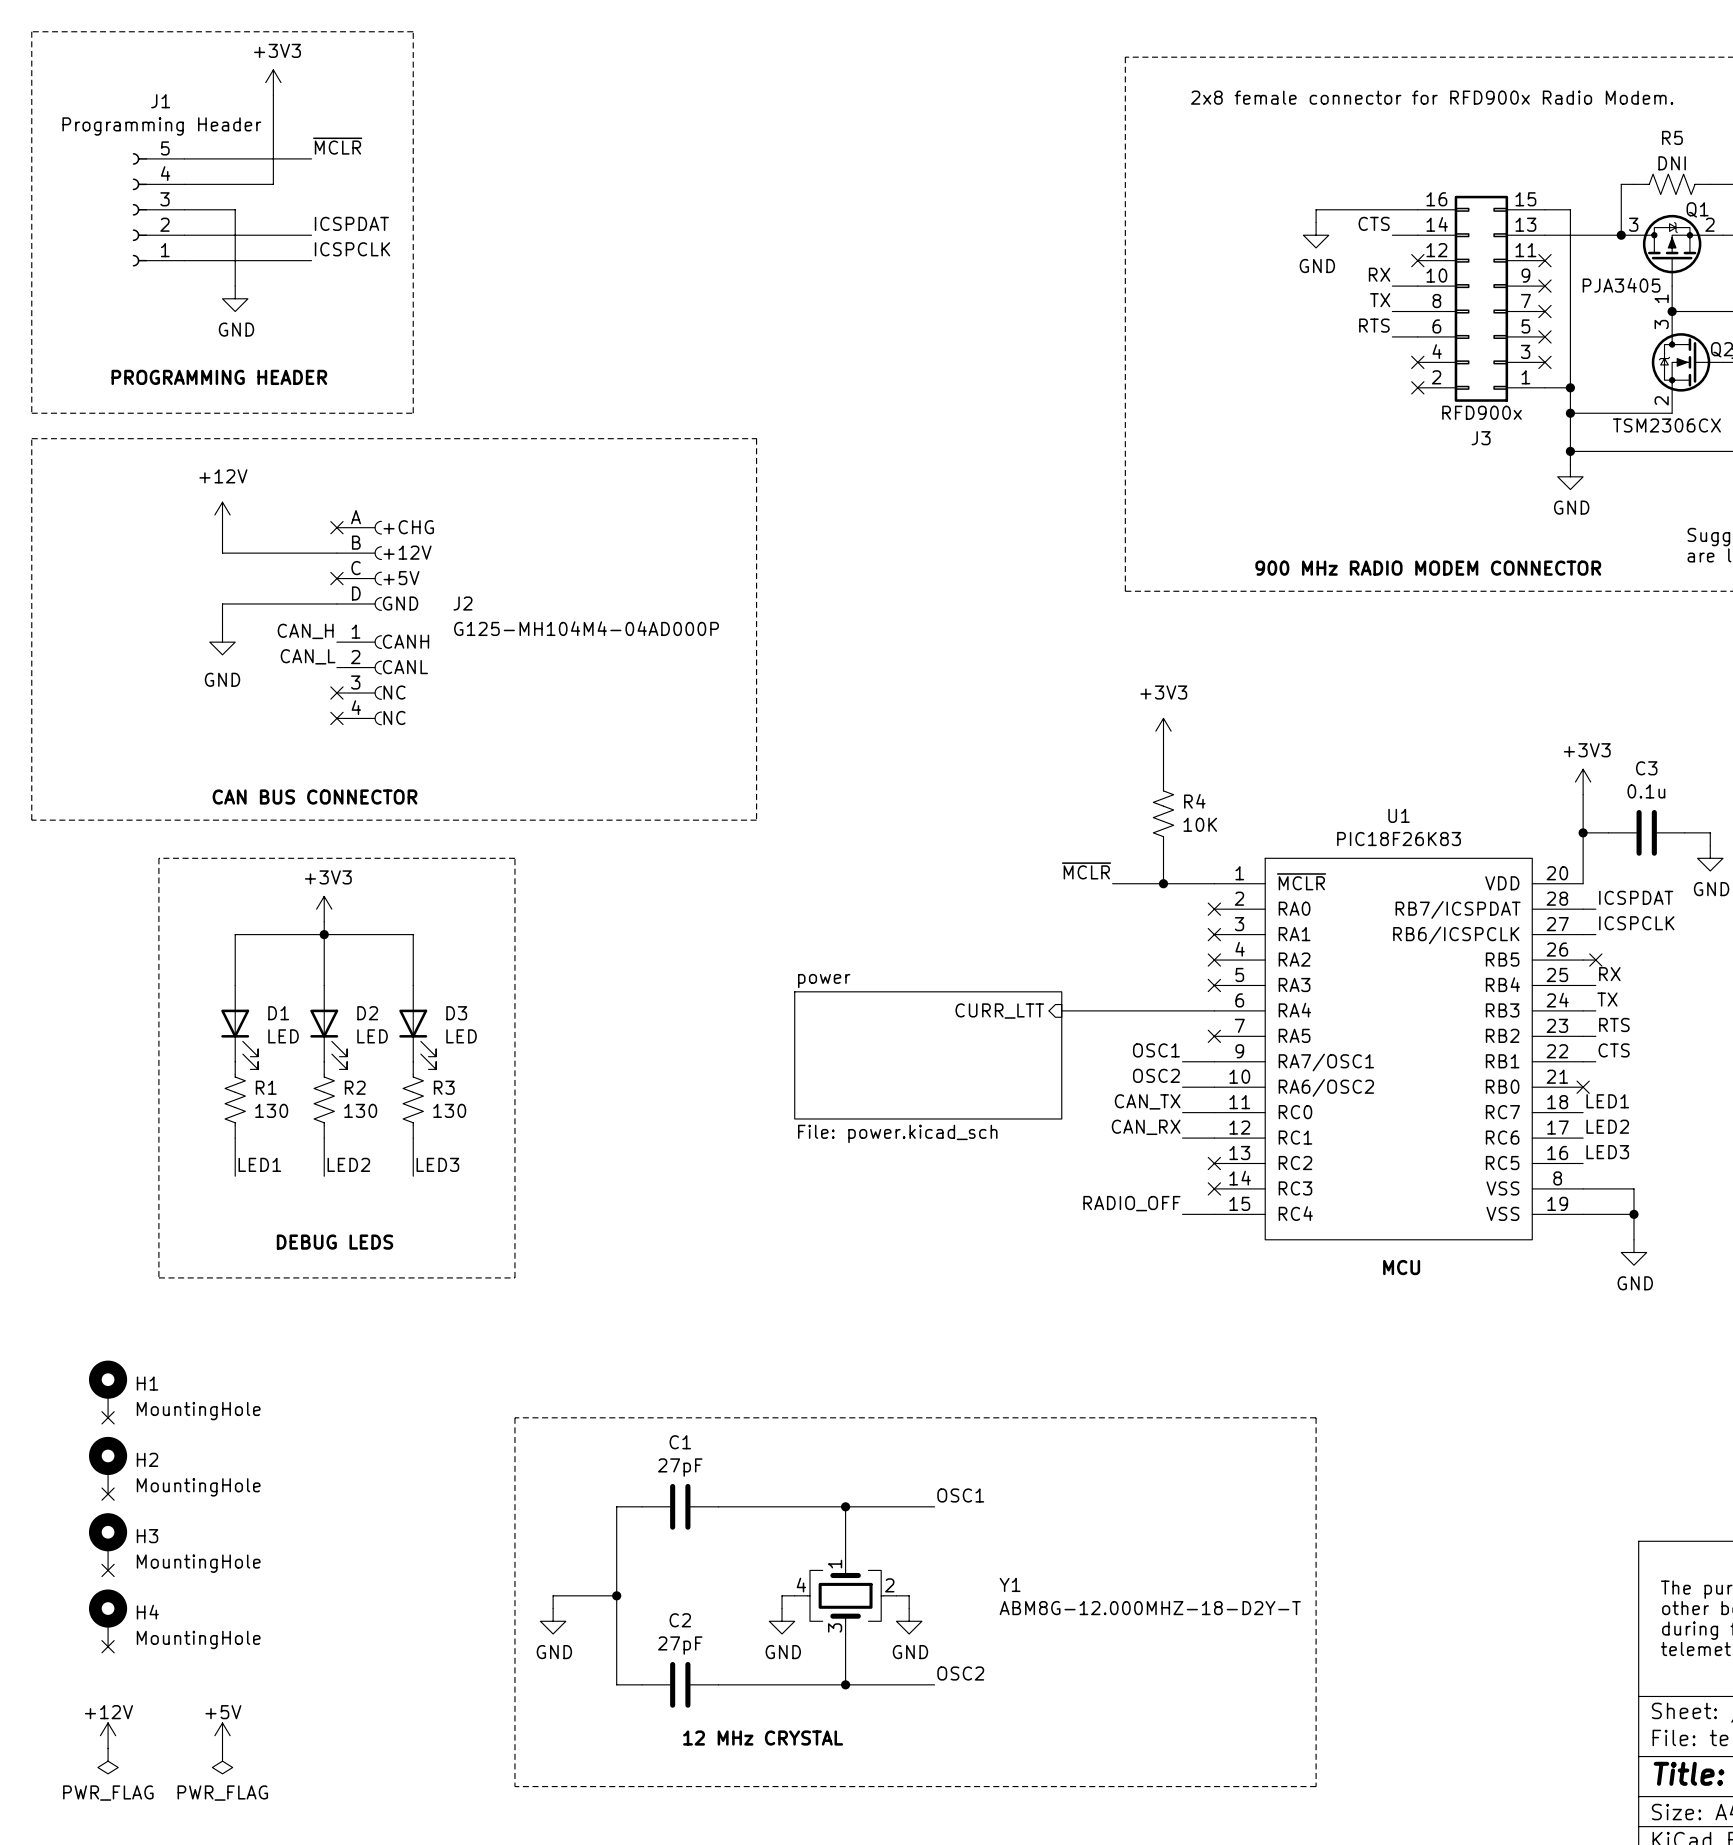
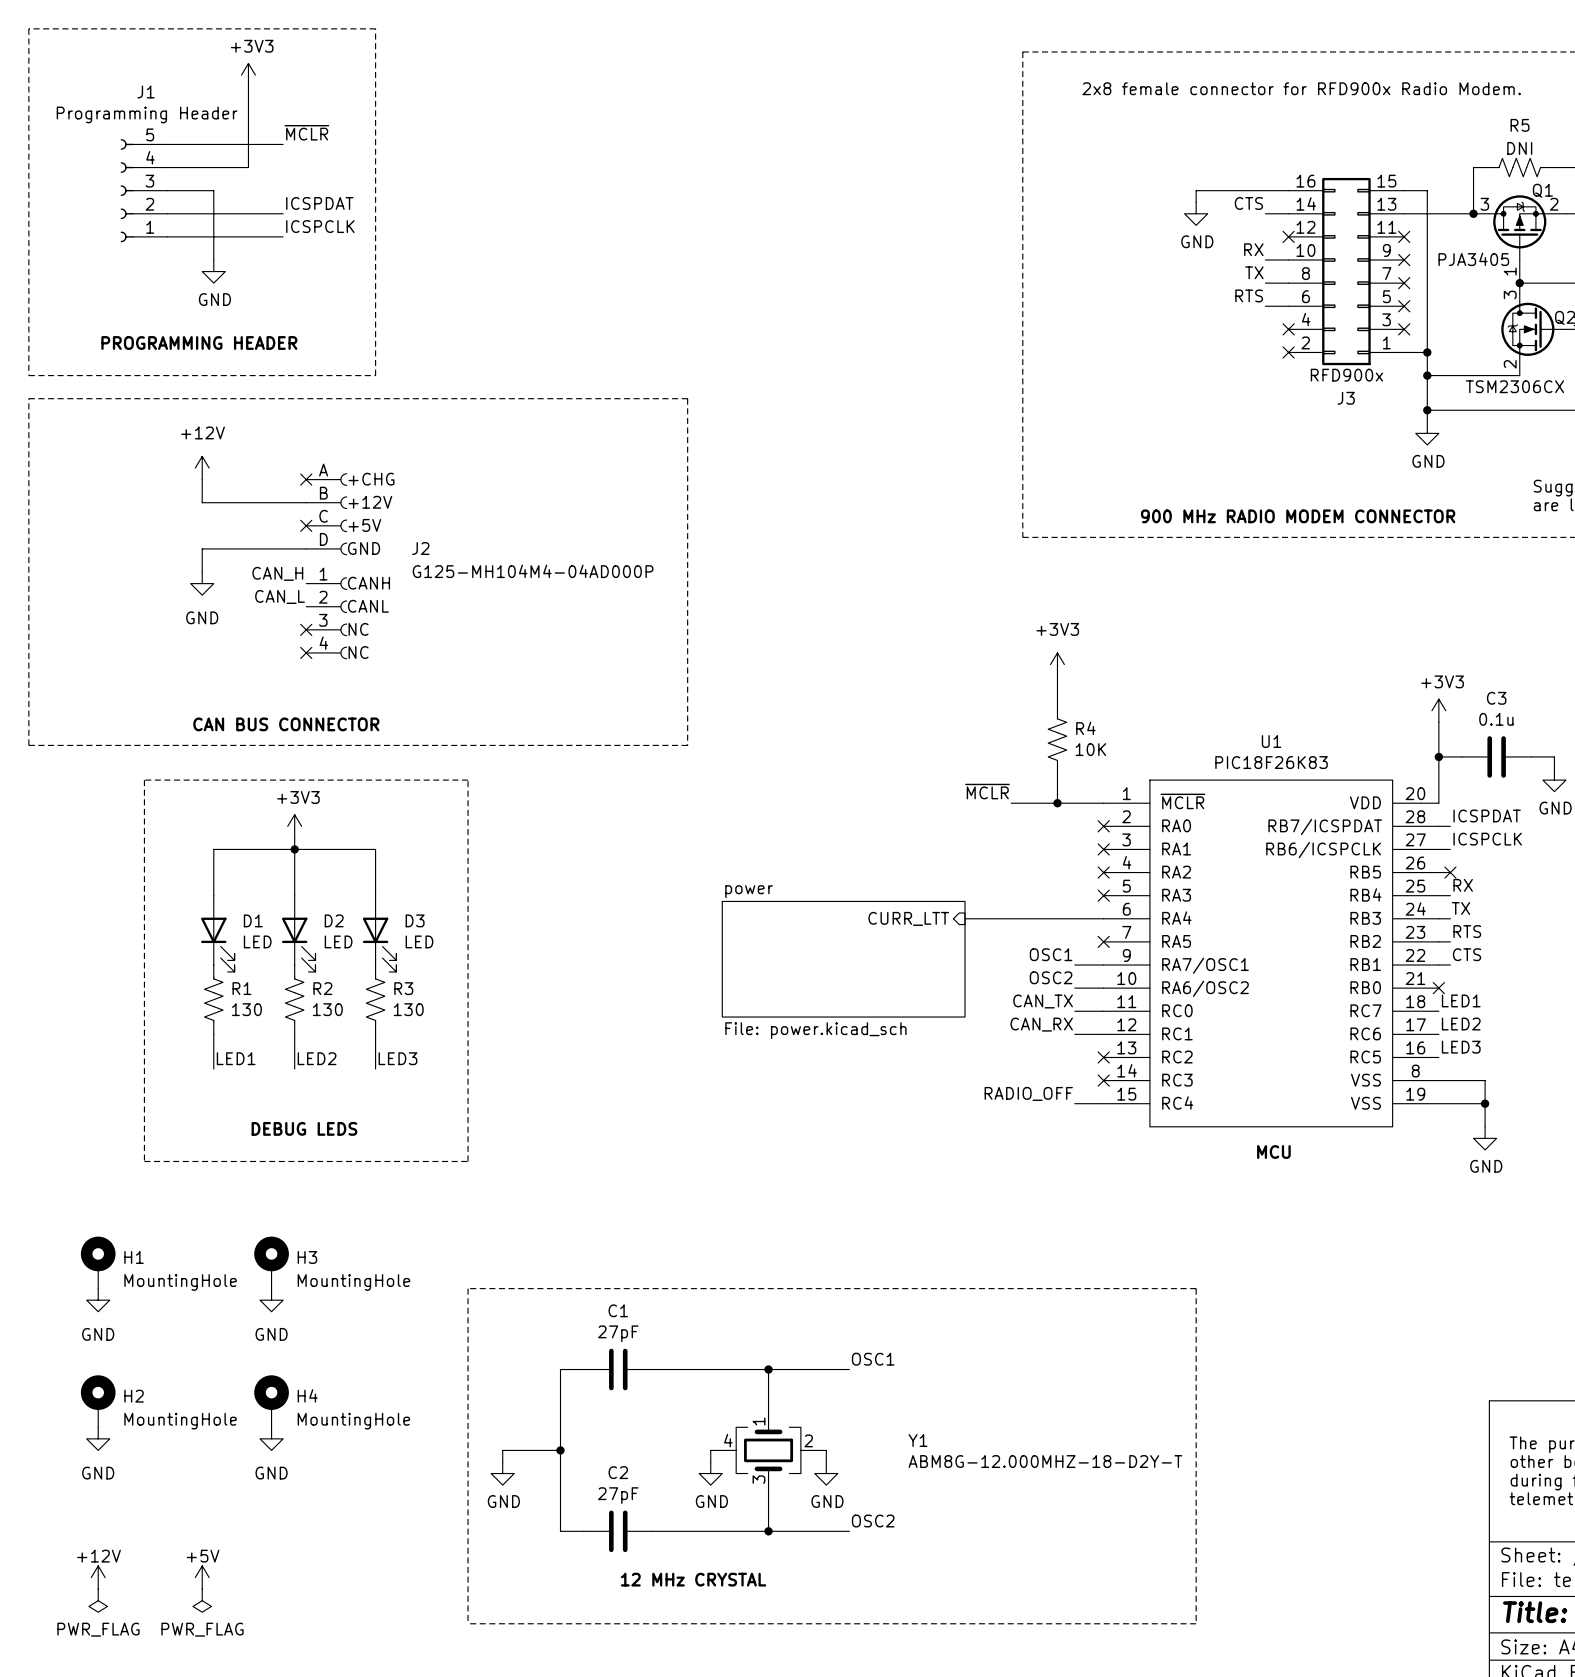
H3: none -> MountingHole (271, 1262)
no-connect mark: (108, 1417) -> none
power symbol: none -> GND (98, 1300)
power symbol: none -> GND (271, 1300)
H2: MountingHole (108, 1465) -> none
no-connect mark: (108, 1494) -> none
H3 name: H3 (147, 1536) -> H2 (134, 1396)
no-connect mark: (108, 1570) -> none
power symbol: none -> GND (98, 1438)
power symbol: none -> GND (271, 1438)
H4 position: (108, 1618) -> (271, 1401)
no-connect mark: (108, 1646) -> none

